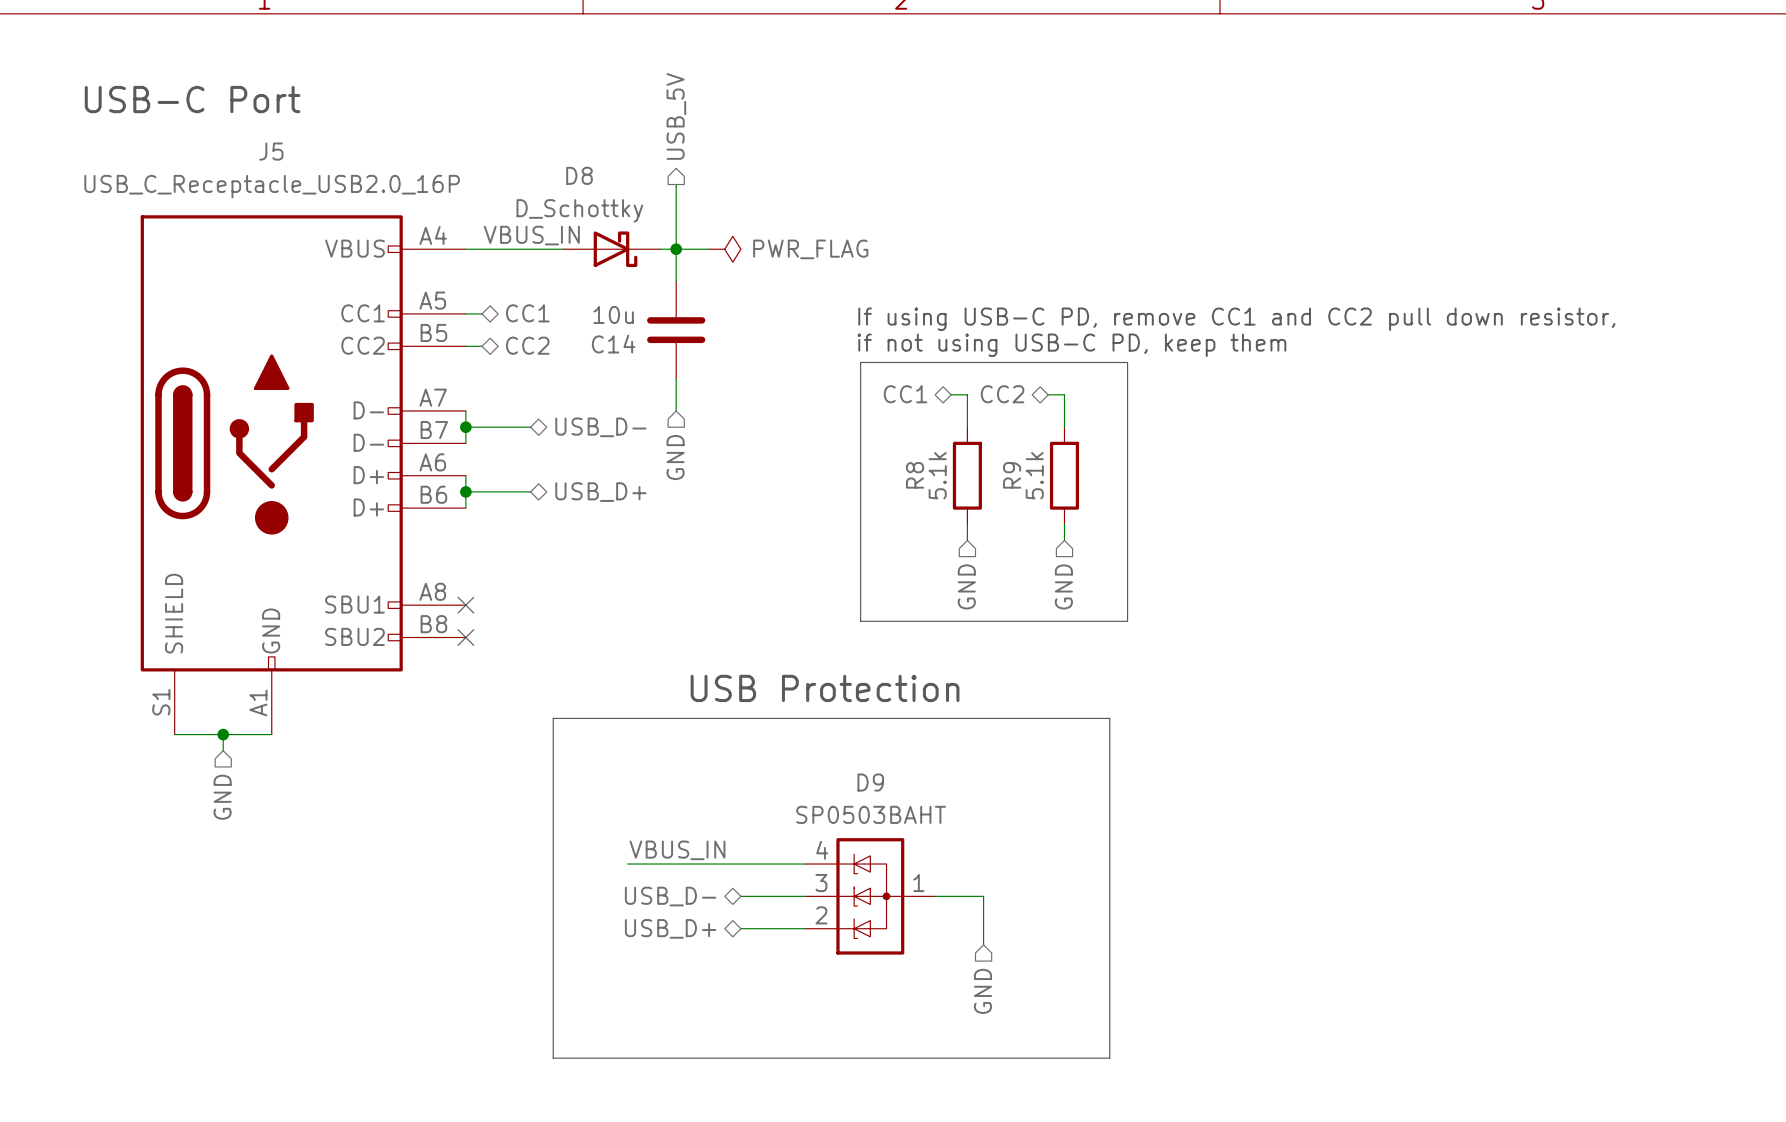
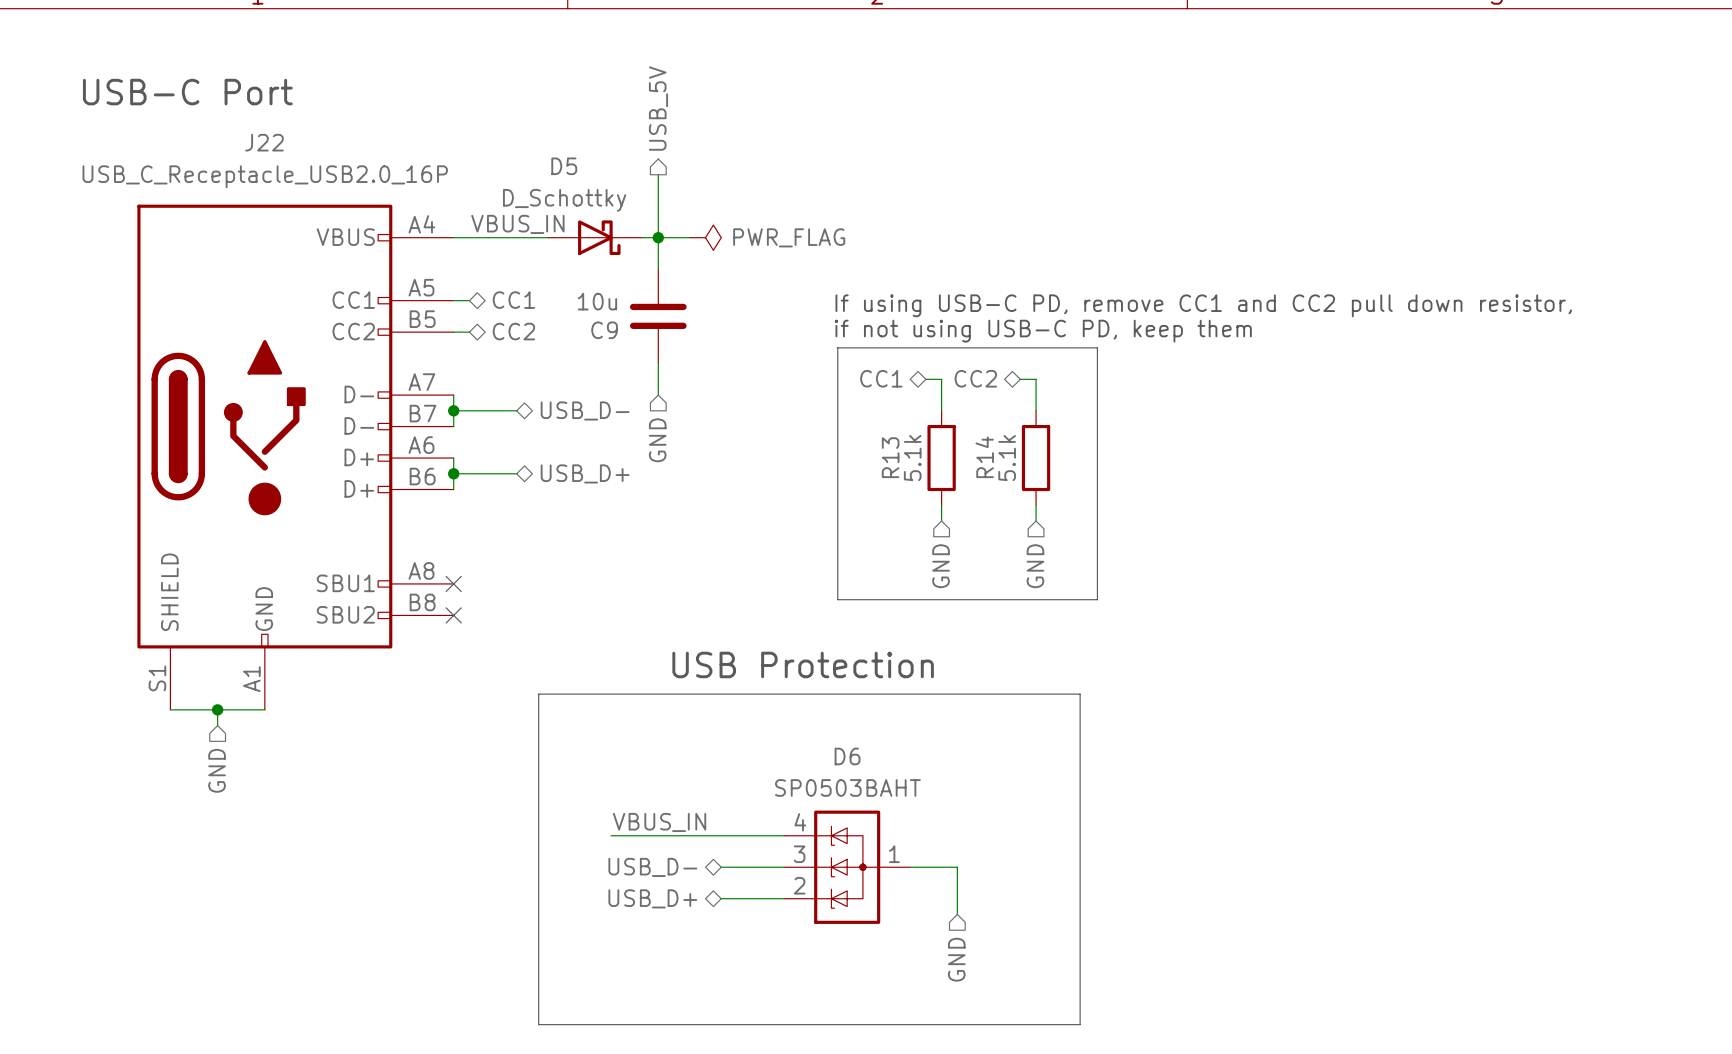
J5 name: J5 (271, 151) -> J22 (264, 142)
D8 name: D8 (579, 175) -> D5 (564, 166)
C14 name: C14 (613, 344) -> C9 (604, 330)
R8 name: R8 (915, 475) -> R13 (890, 457)
R9 name: R9 (1012, 475) -> R14 (984, 457)
D9 name: D9 (870, 782) -> D6 (847, 756)

